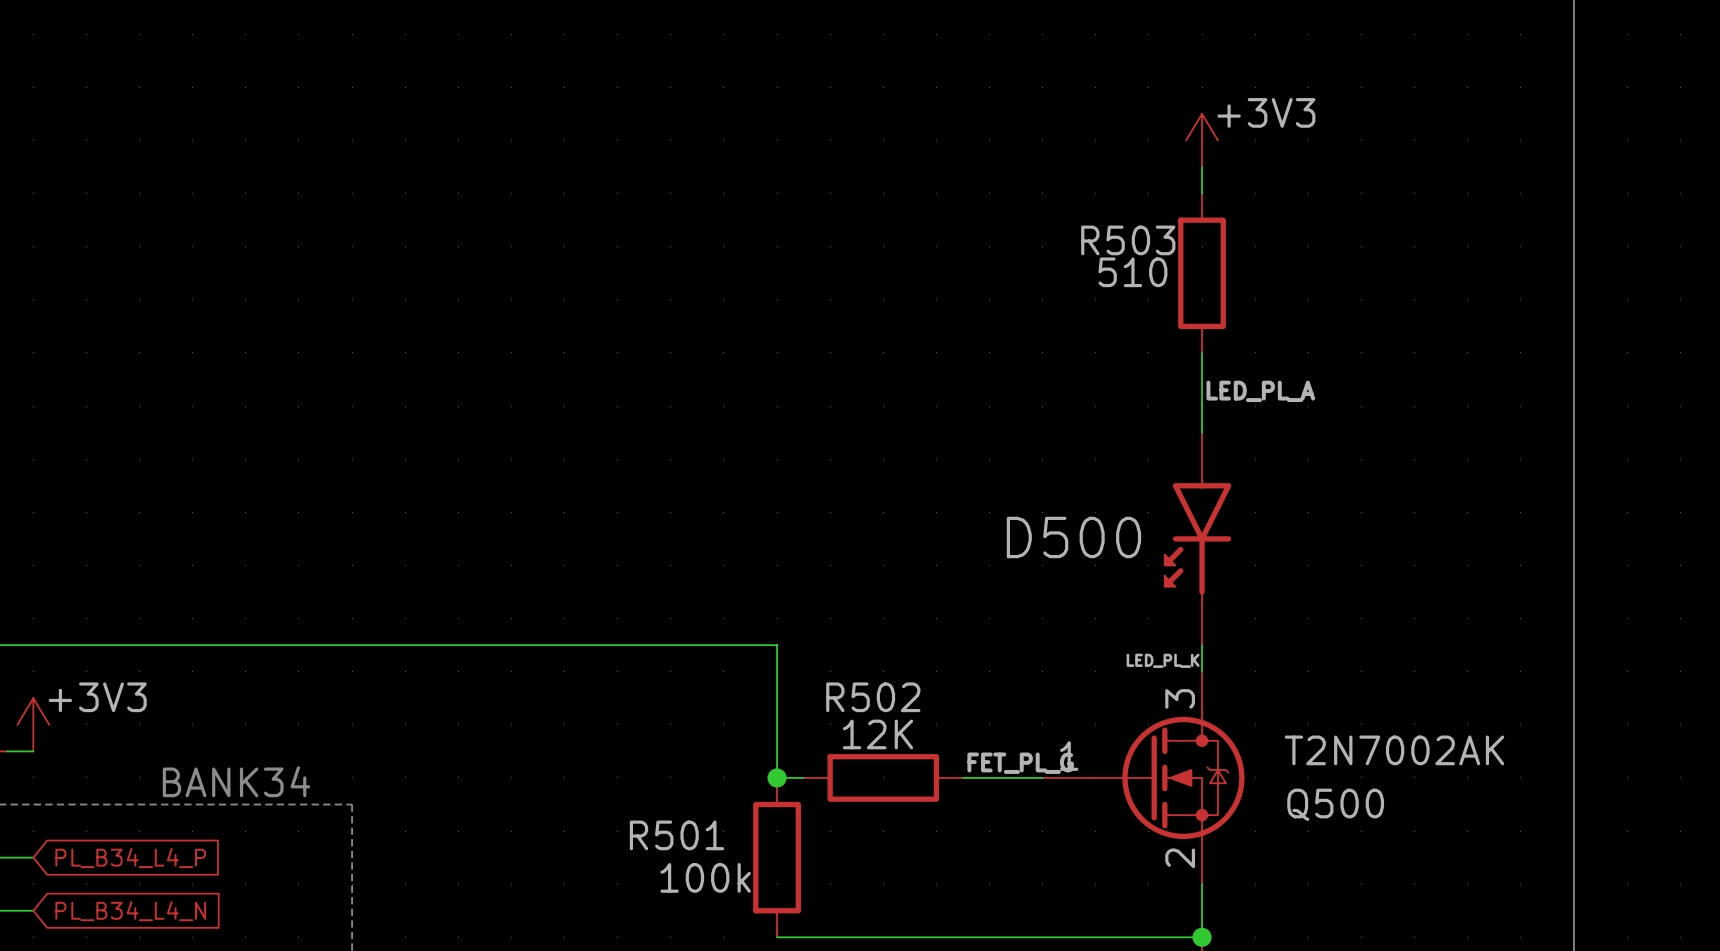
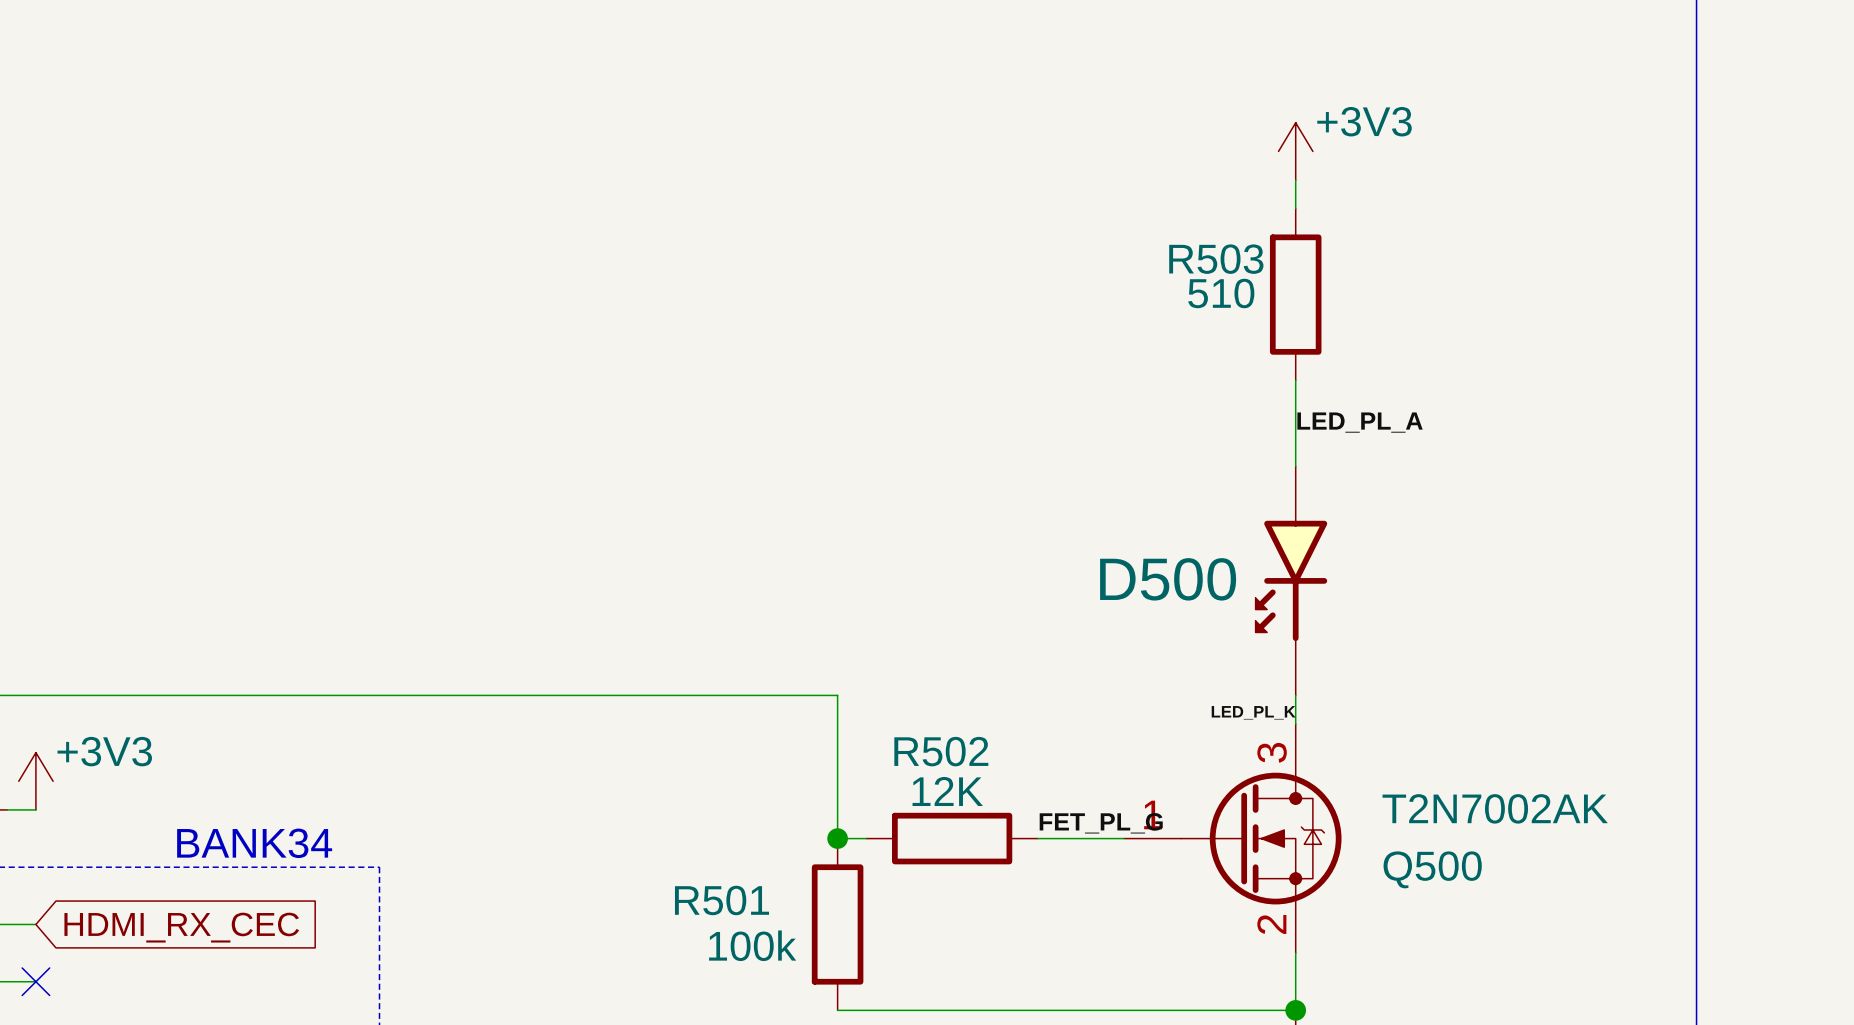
global label: PL_B34_L4_P (130, 858) -> HDMI_RX_CEC (181, 927)
no-connect mark: none -> (35, 981)
global label: PL_B34_L4_N (130, 911) -> none

